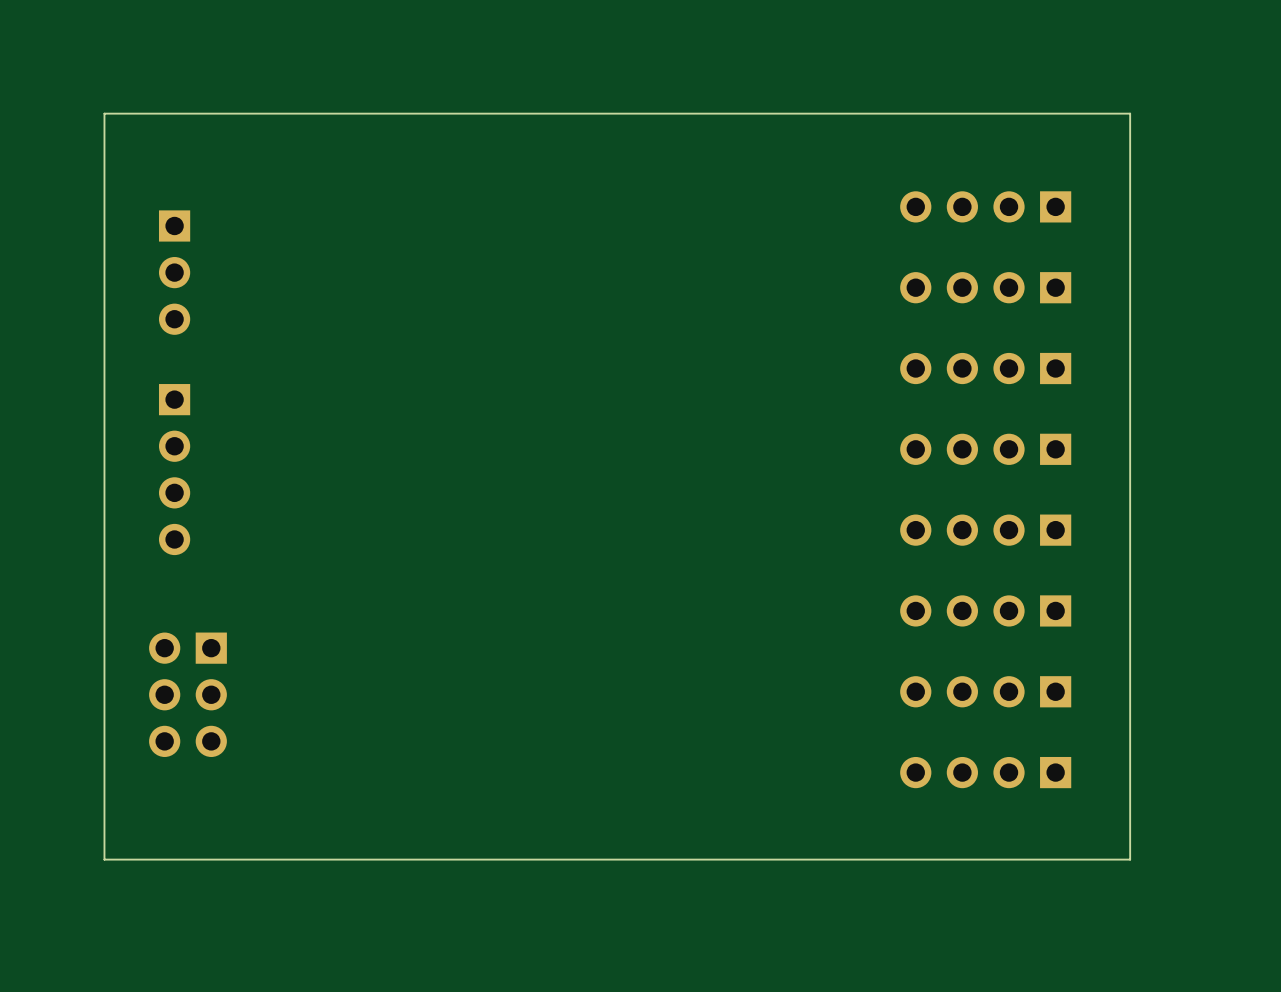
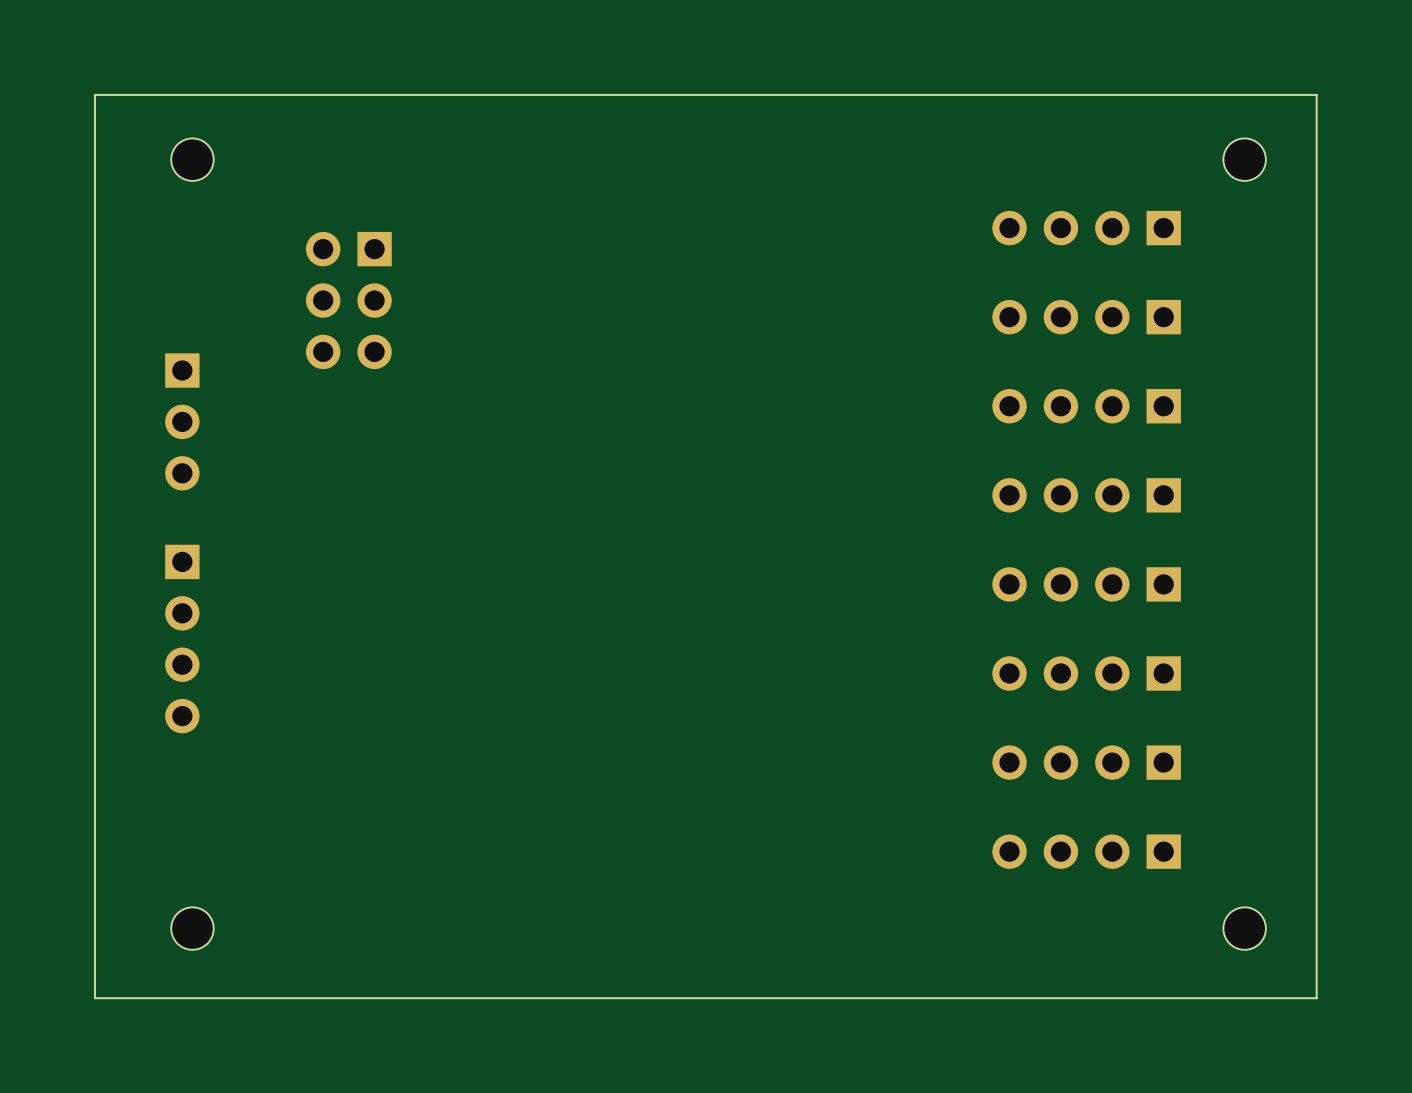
board edge: (1130, 113) (104, 113) (104, 859) (1130, 859) (1130, 113) -> (1316, 94) (1316, 998) (94, 998) (94, 94) (1316, 94)
part: none -> (192, 159)
part: none -> (1244, 159)
part position: (174, 272) -> (182, 421)
part position: (174, 469) -> (182, 639)
part position: (187, 694) -> (348, 300)
part: none -> (192, 928)
part: none -> (1244, 928)

